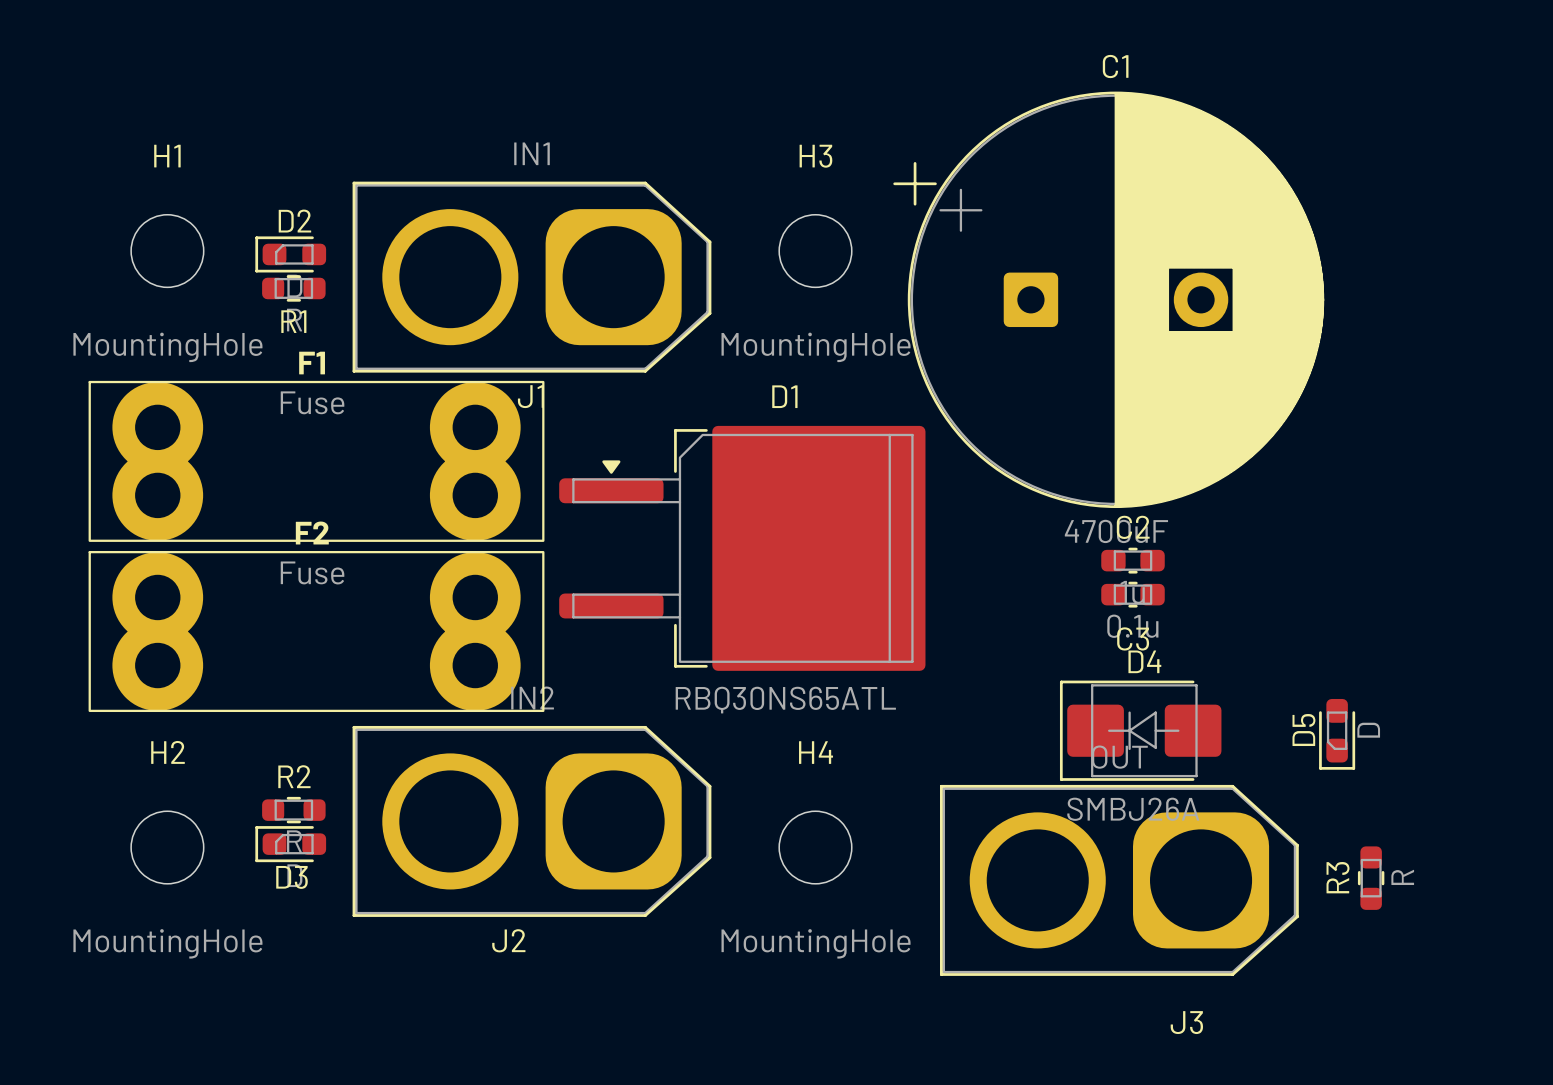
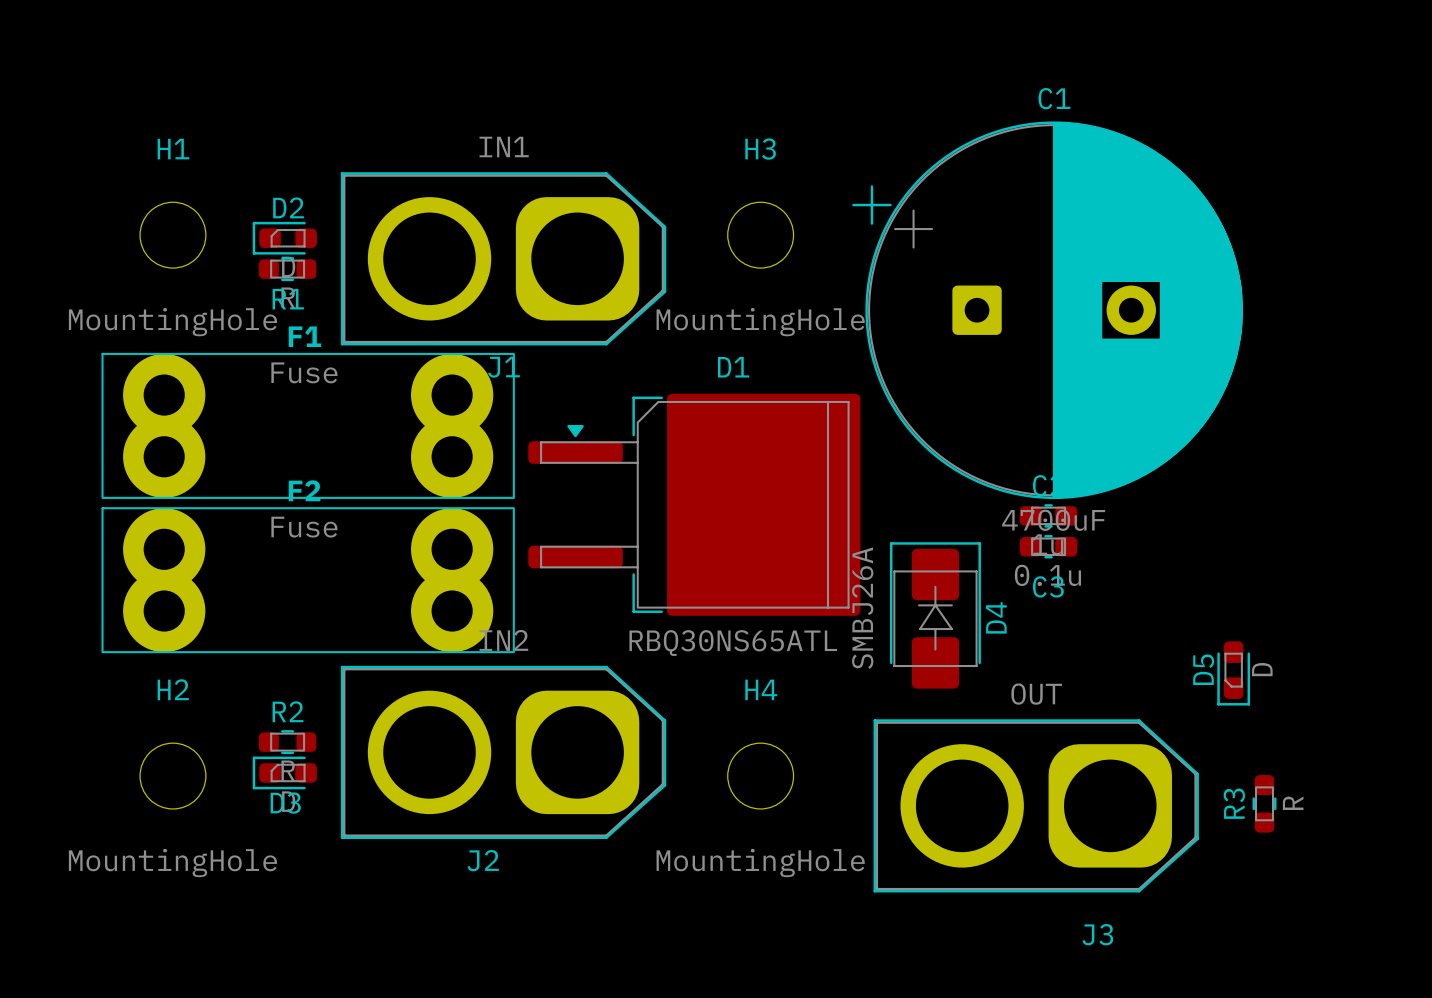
C1 position: (1108, 299) -> (1047, 310)
D4 rotation: 0° (1140, 730) -> 90° clockwise (935, 615)
D4 position: (1140, 730) -> (935, 615)

